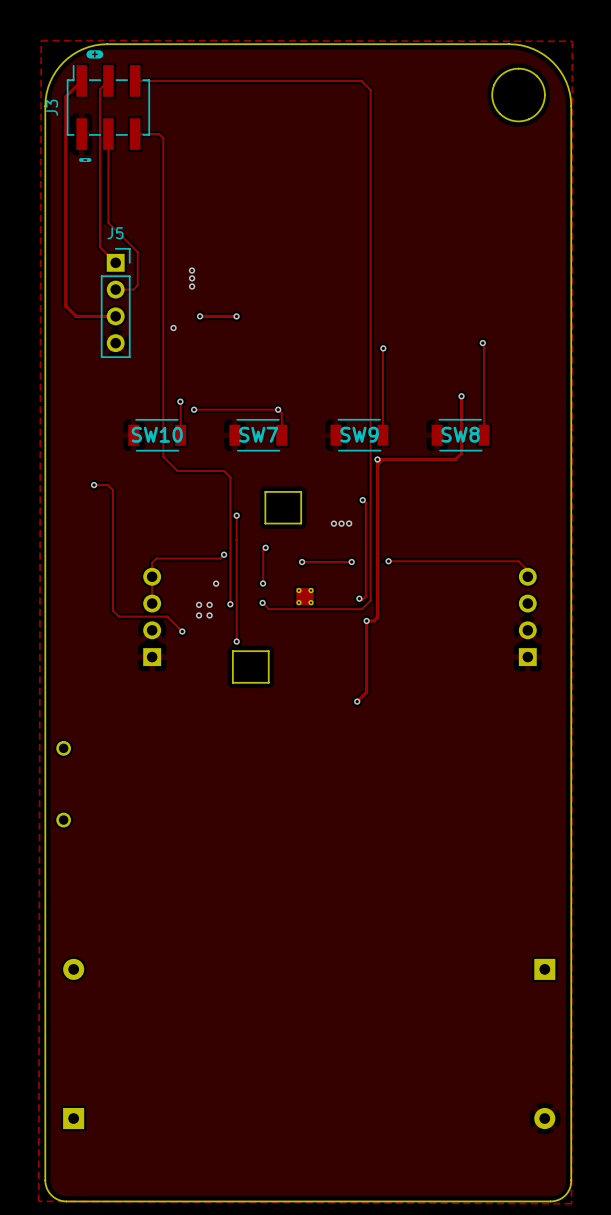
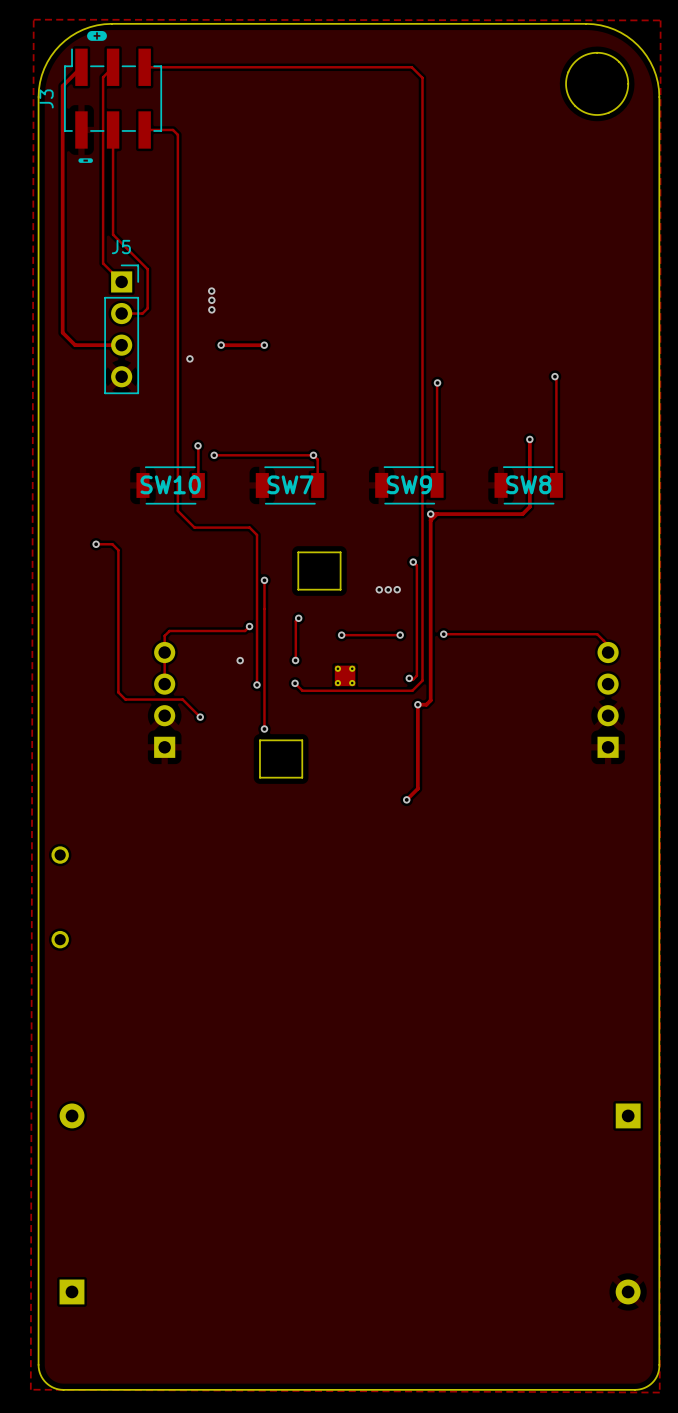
via: (199, 604) -> none
via: (209, 604) -> none
via: (199, 615) -> none
via: (209, 615) -> none

